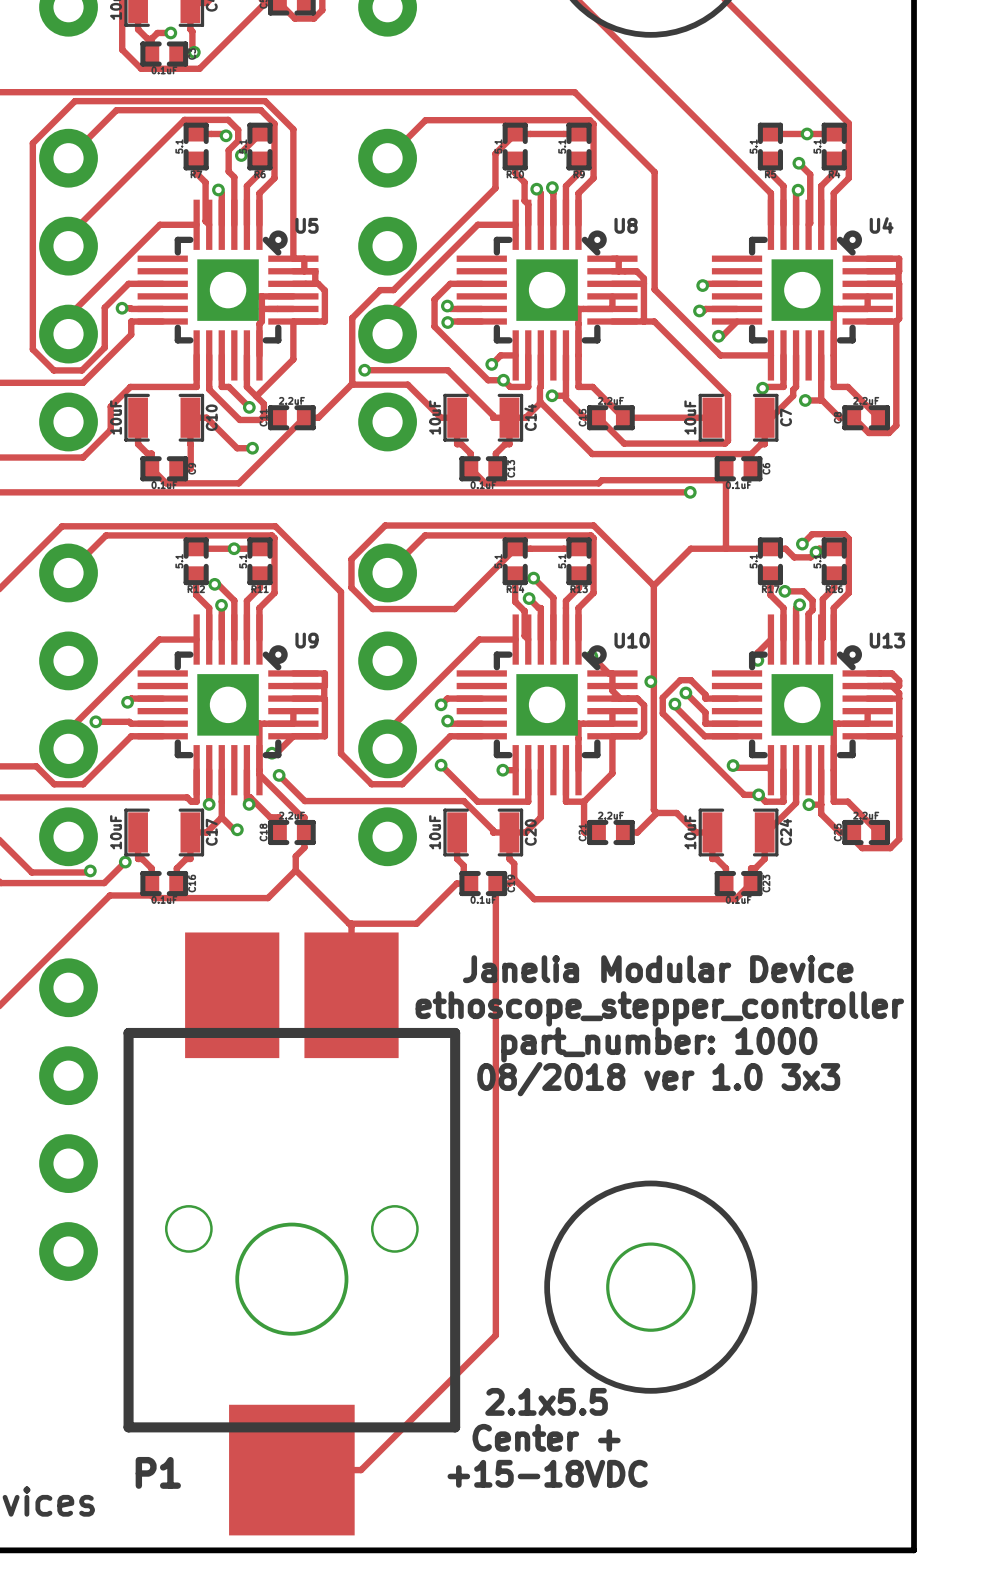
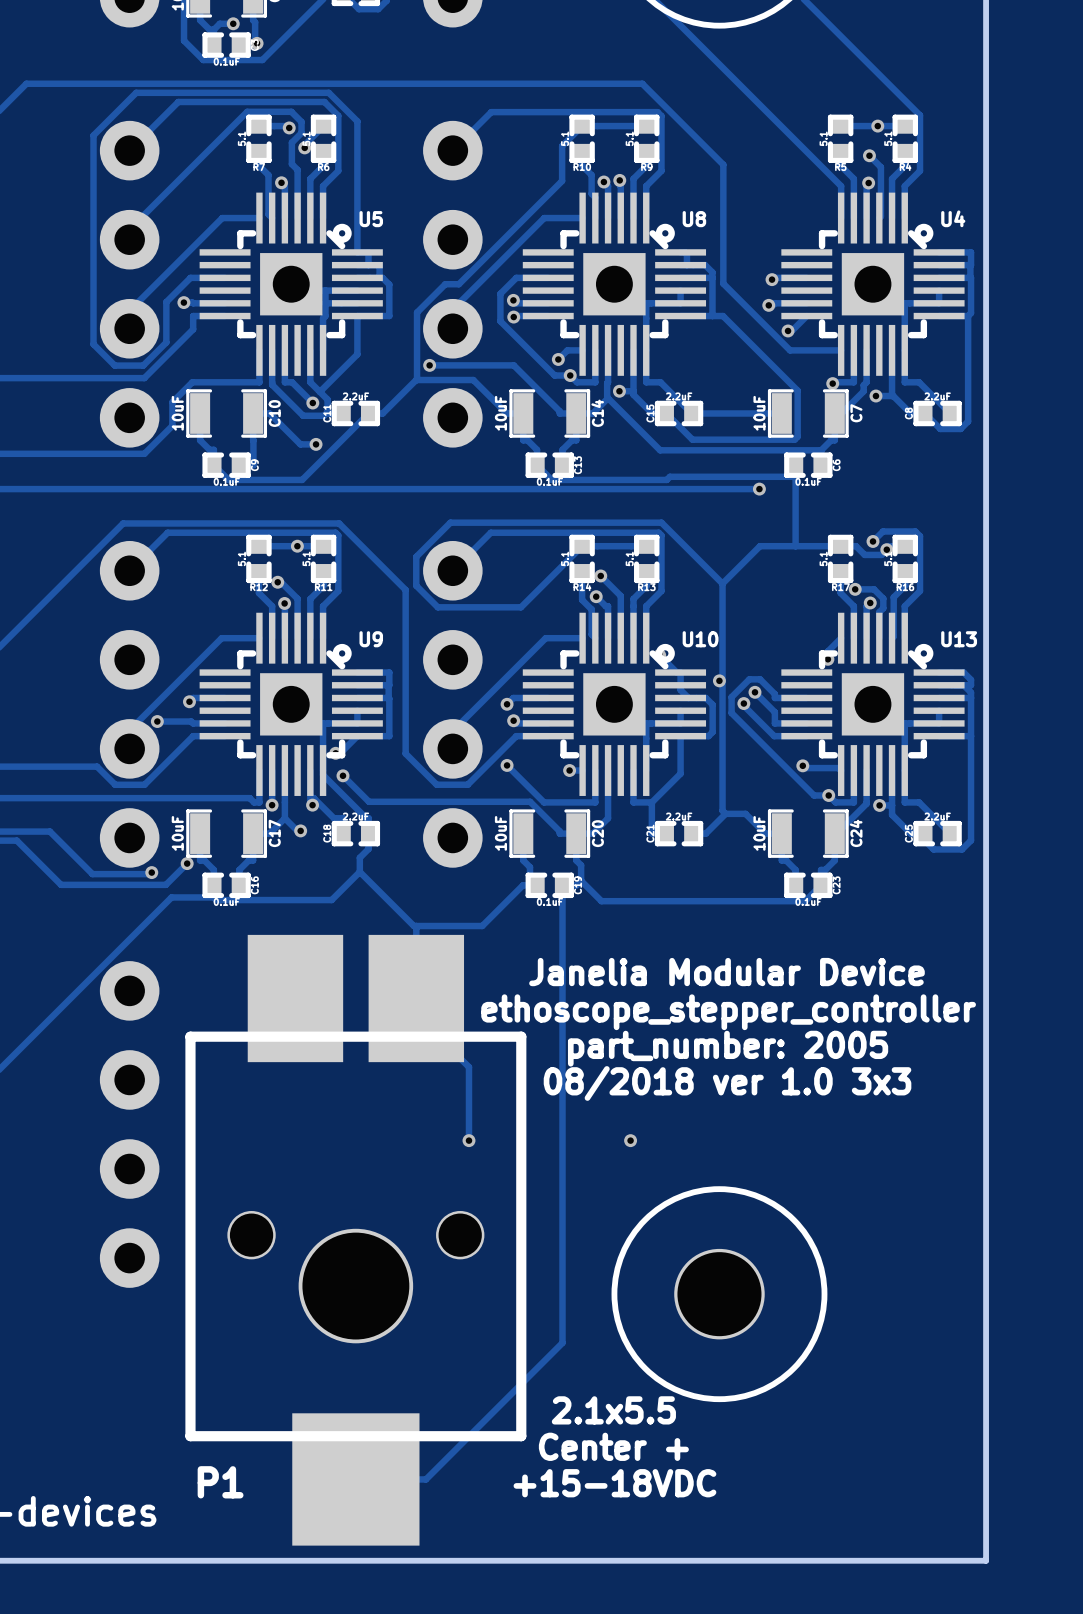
track: none -> (416, 998) (416, 1014) (468, 1067) (468, 1140)
text: part_number: 1000 (659, 1044) -> part_number: 2005 (728, 1048)
via: none -> (468, 1140)
via: none -> (630, 1140)

